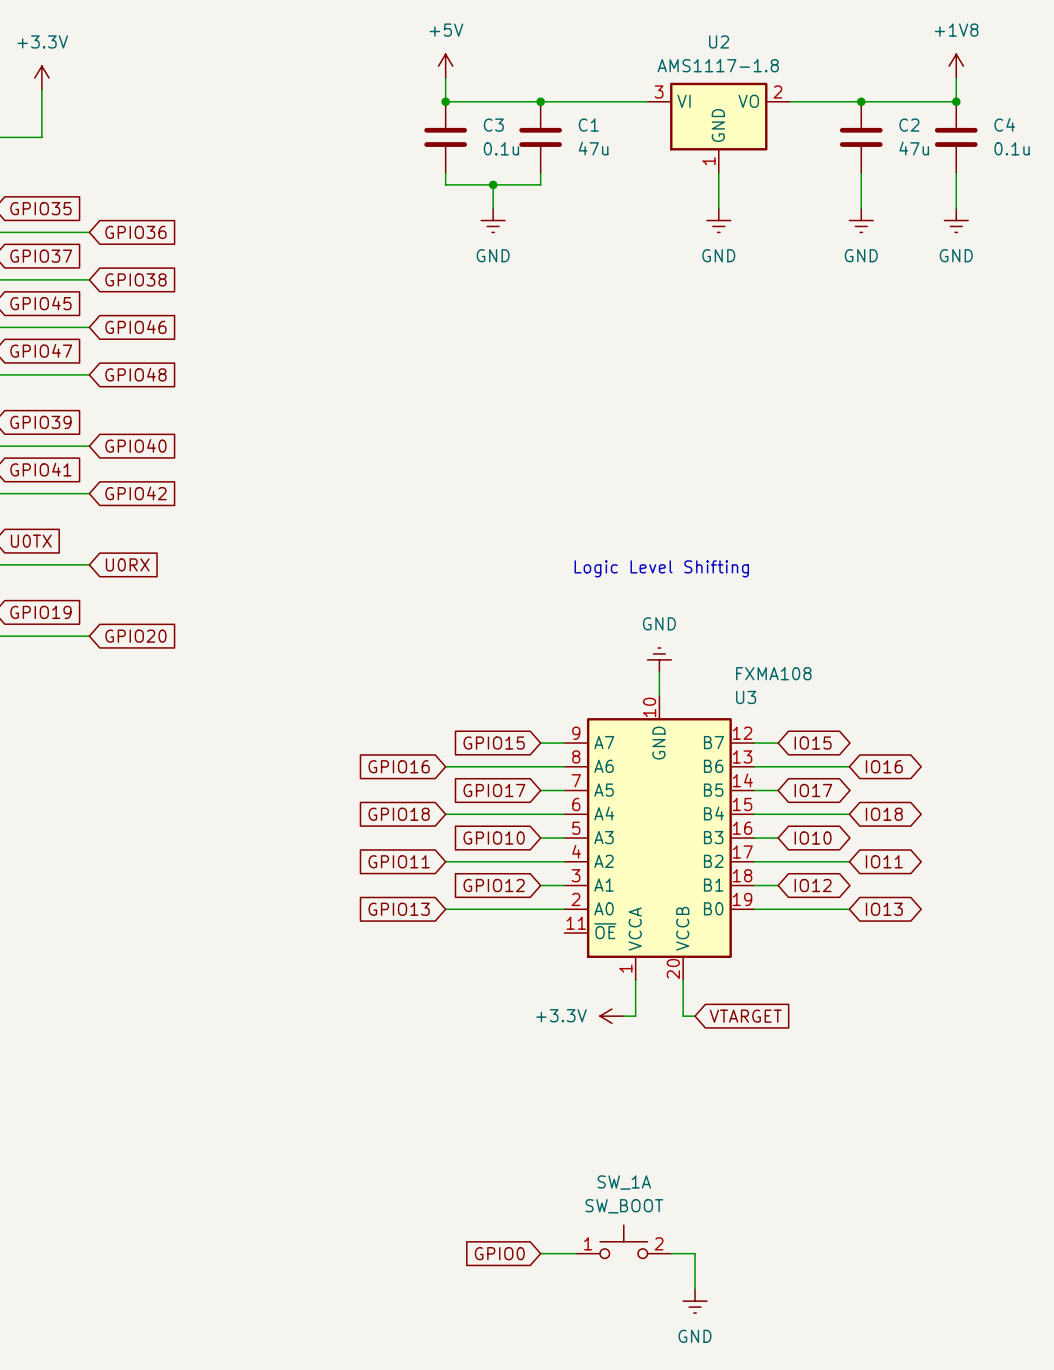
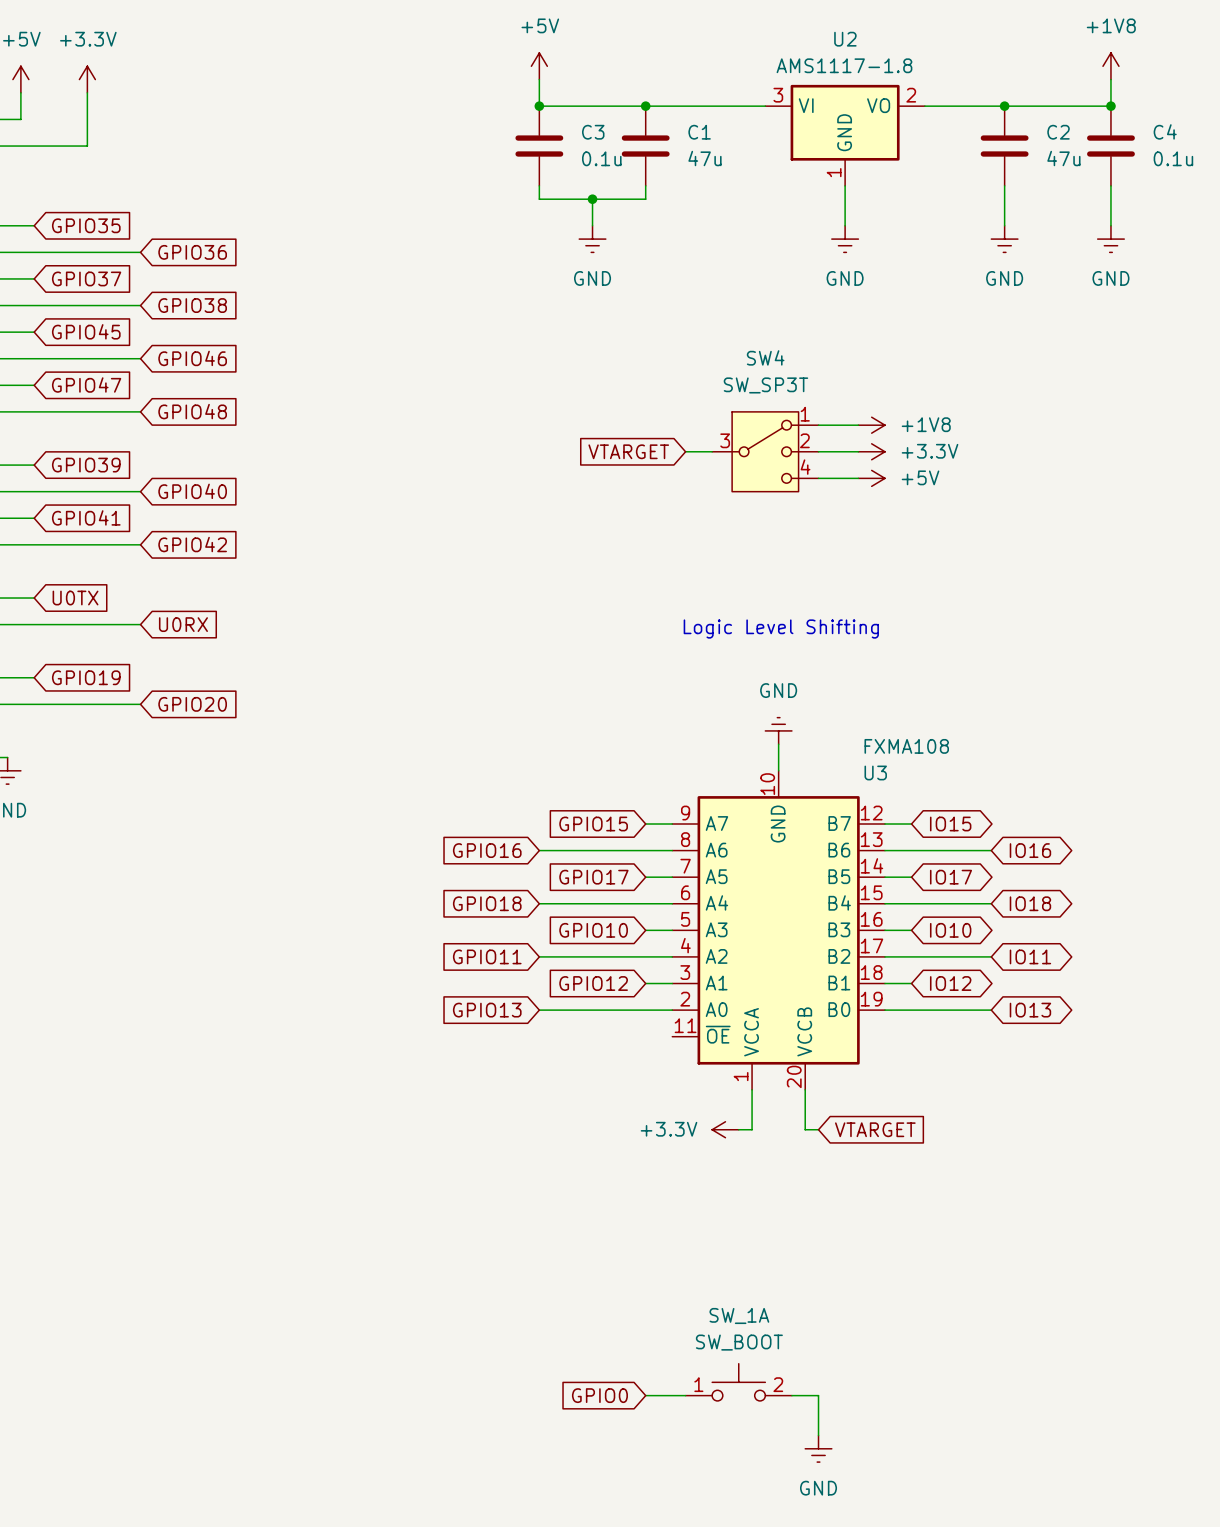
wire: none -> (818, 425) (858, 425)
power symbol: none -> +1V8 (871, 425)
global label: none -> VTARGET (628, 451)
wire: none -> (685, 451) (712, 451)
SW4: none -> SW_SP3T (765, 451)
wire: none -> (818, 451) (858, 451)
power symbol: none -> +3.3V (871, 451)
wire: none -> (818, 478) (858, 478)
power symbol: none -> +5V (871, 478)

